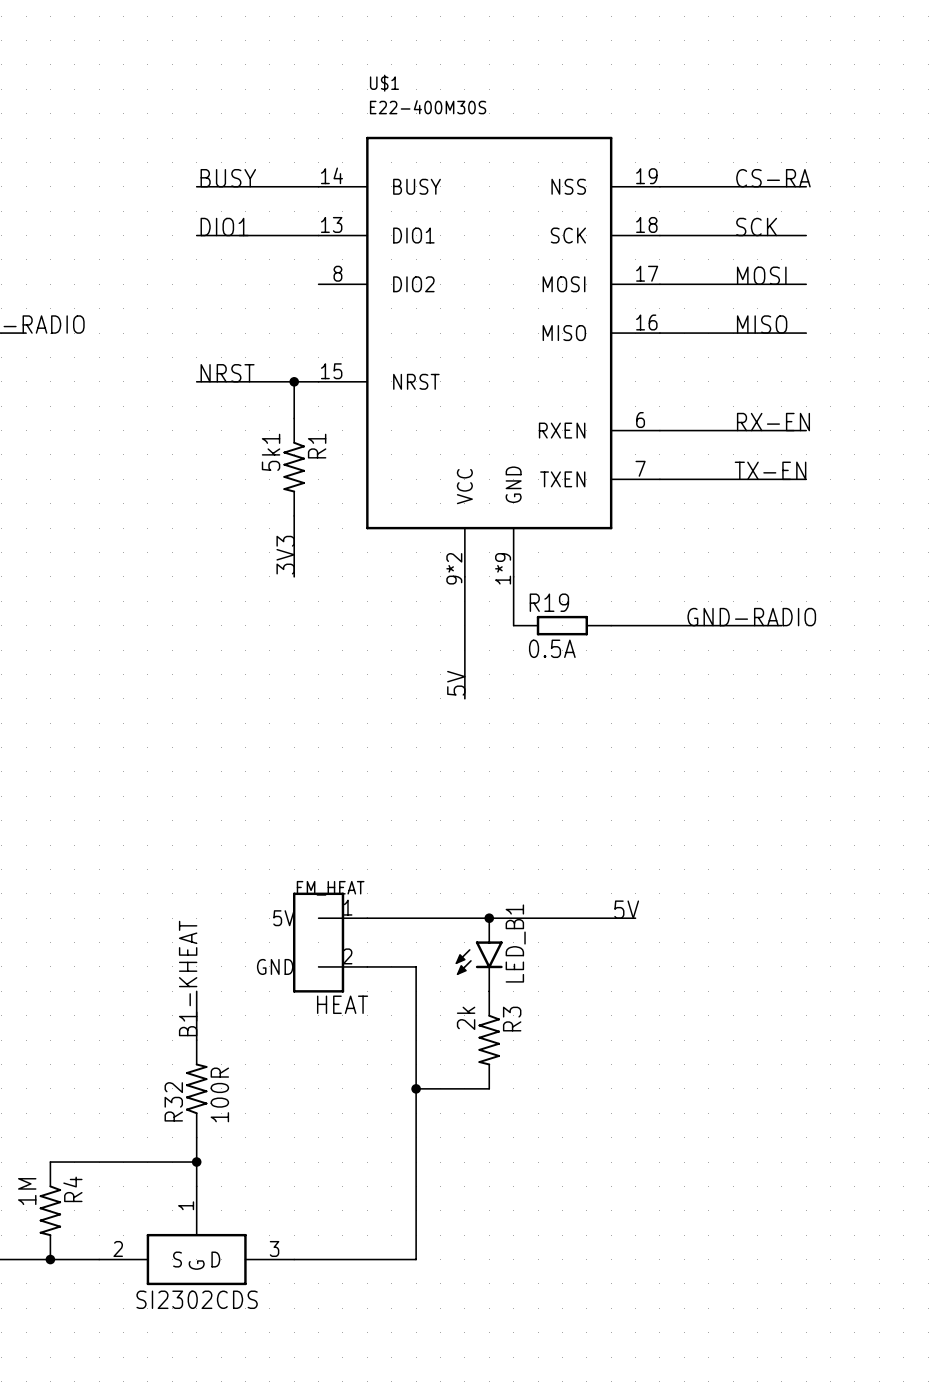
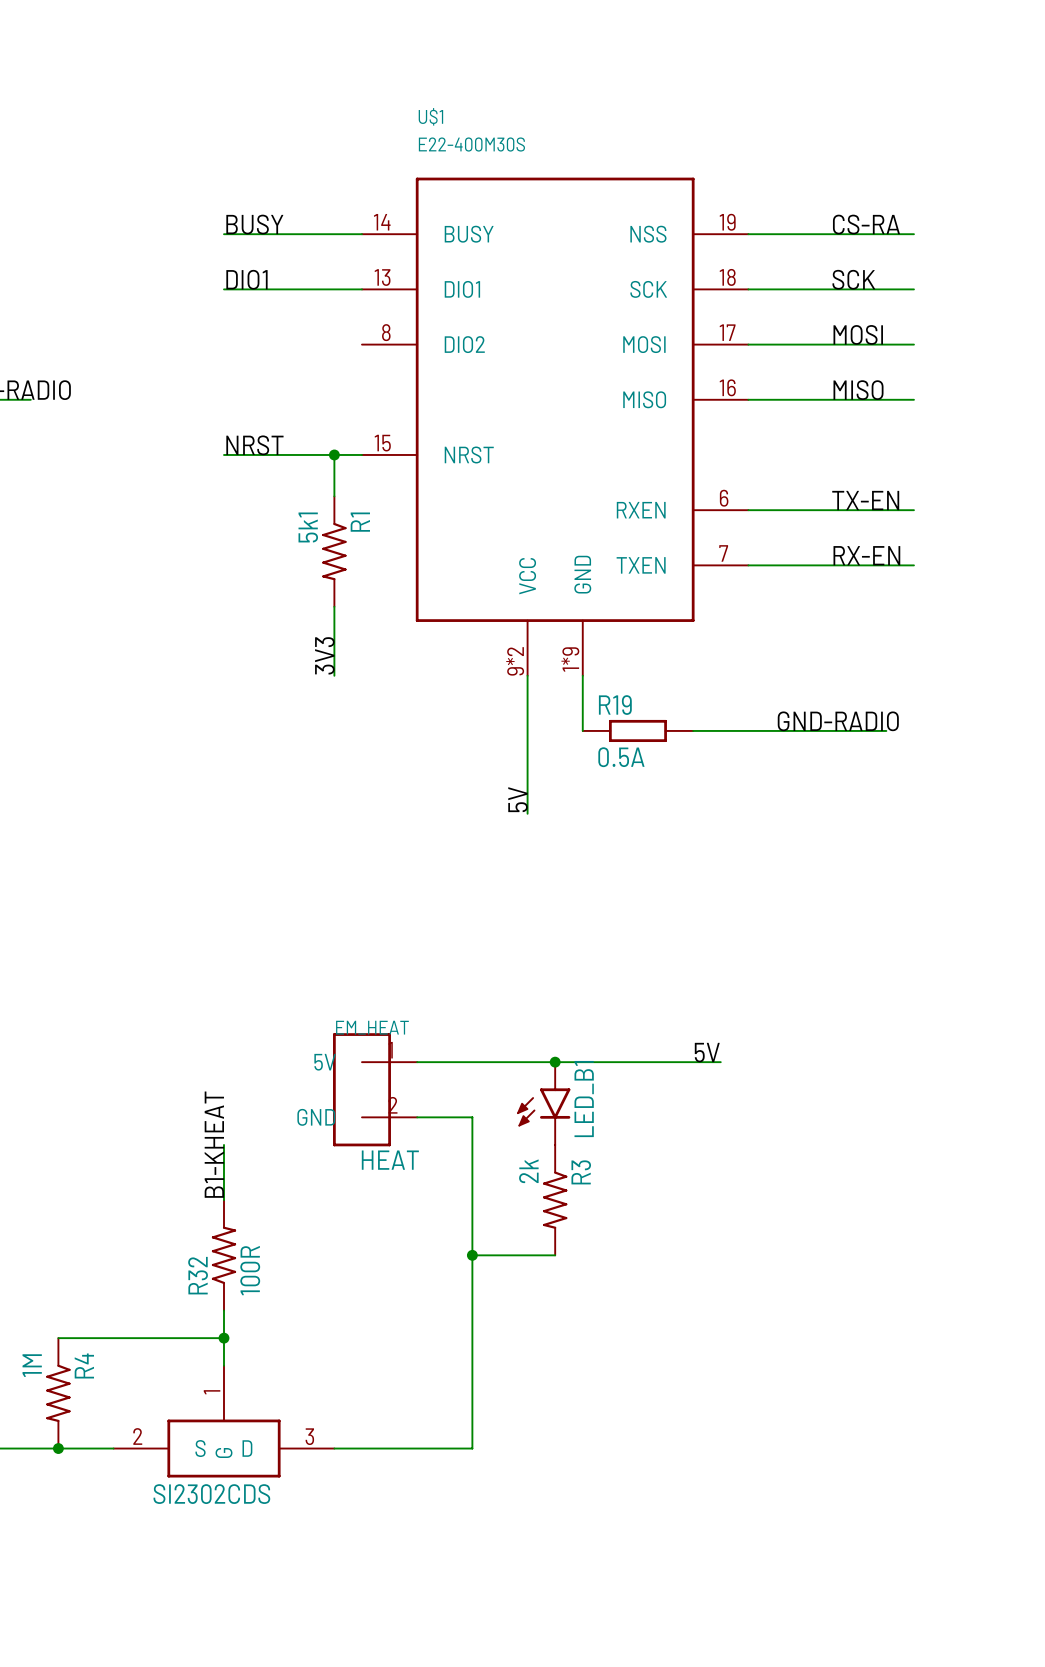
label: RX-EN (773, 422) -> TX-EN (865, 500)
label: TX-EN (770, 470) -> RX-EN (866, 555)

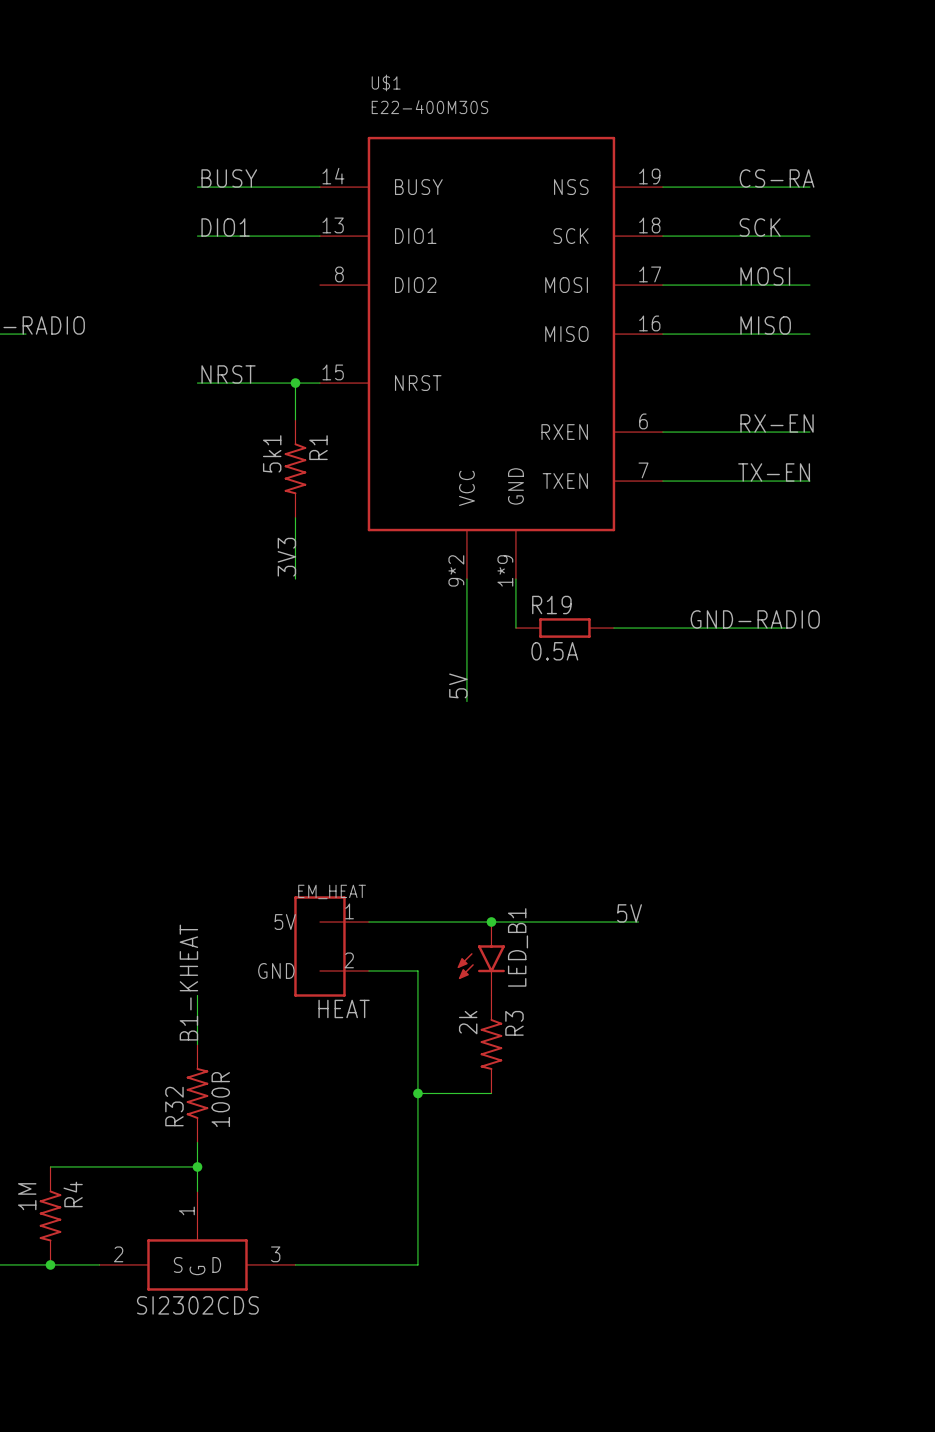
label: TX-EN (865, 500) -> RX-EN (777, 423)
label: RX-EN (866, 555) -> TX-EN (774, 472)

